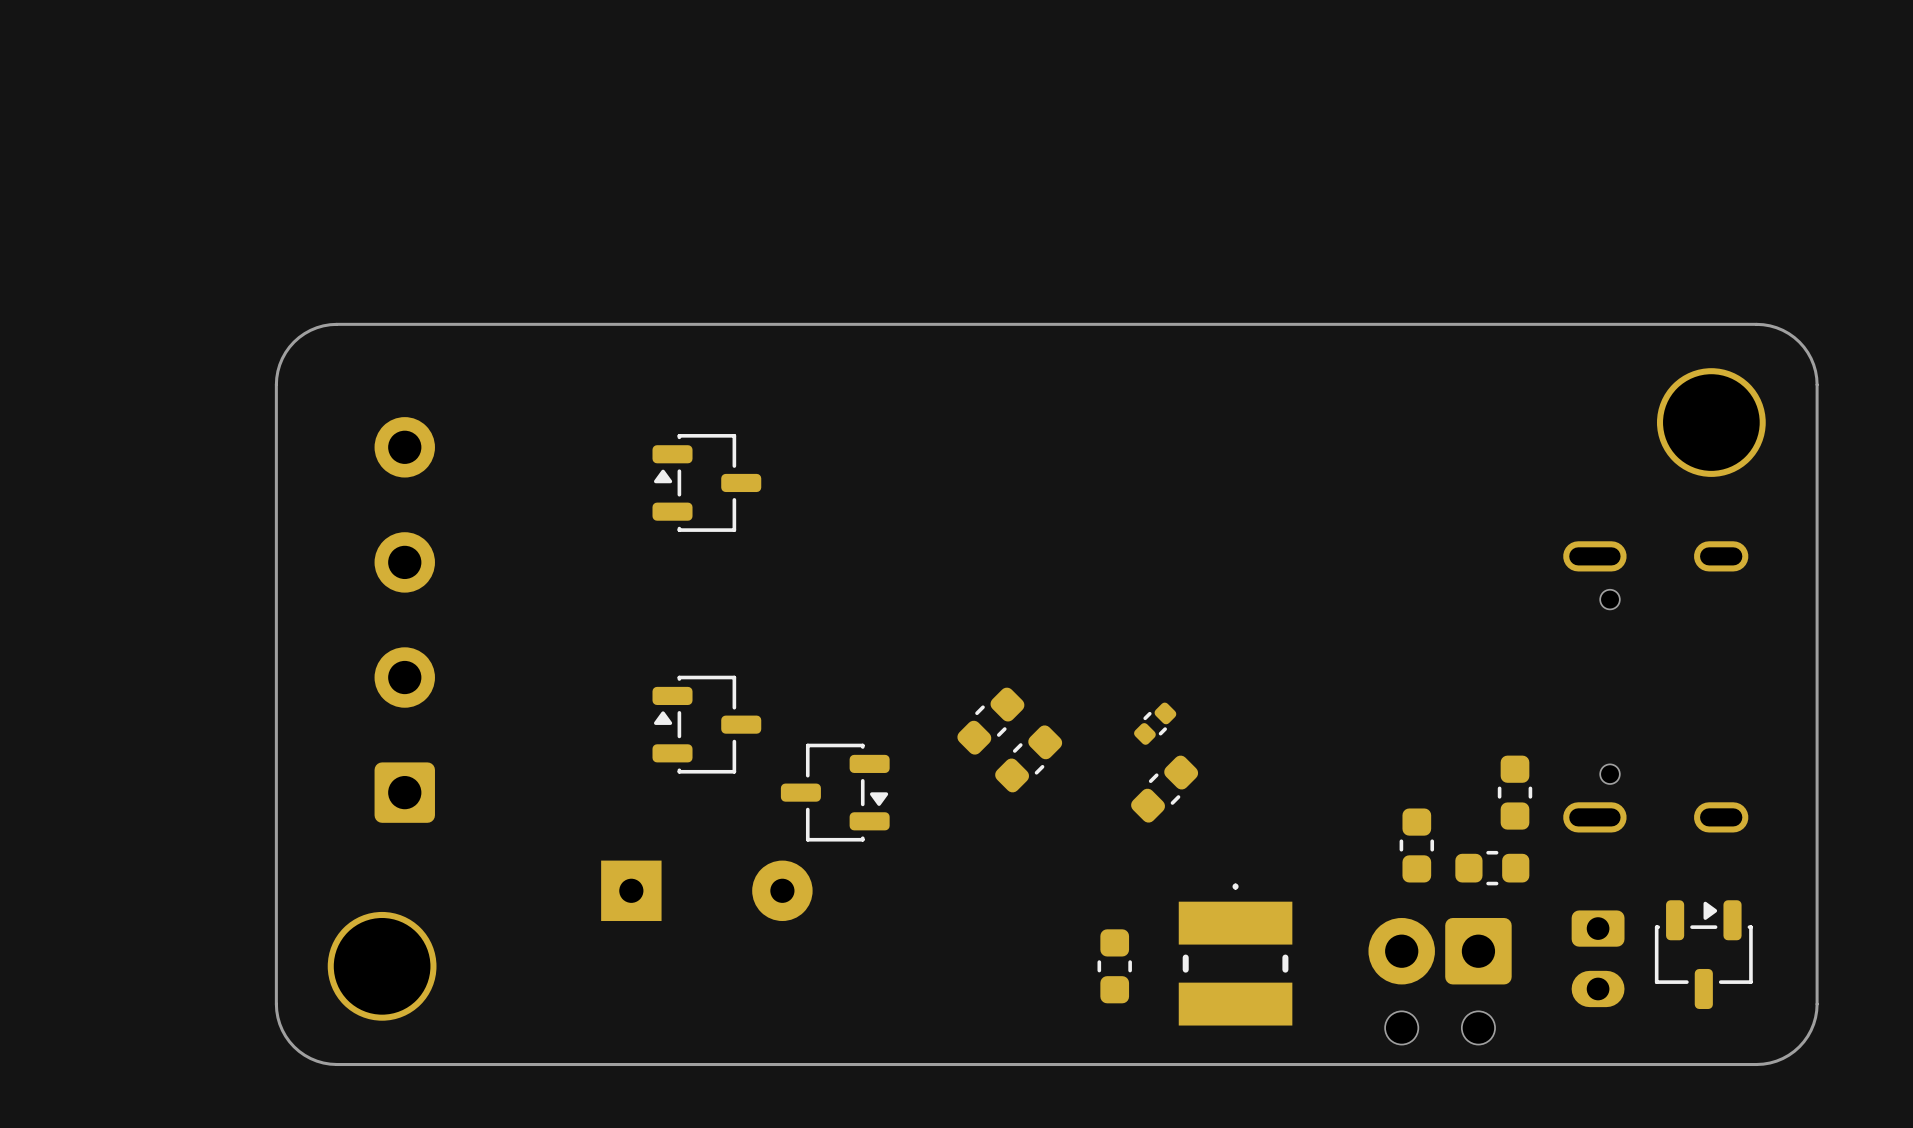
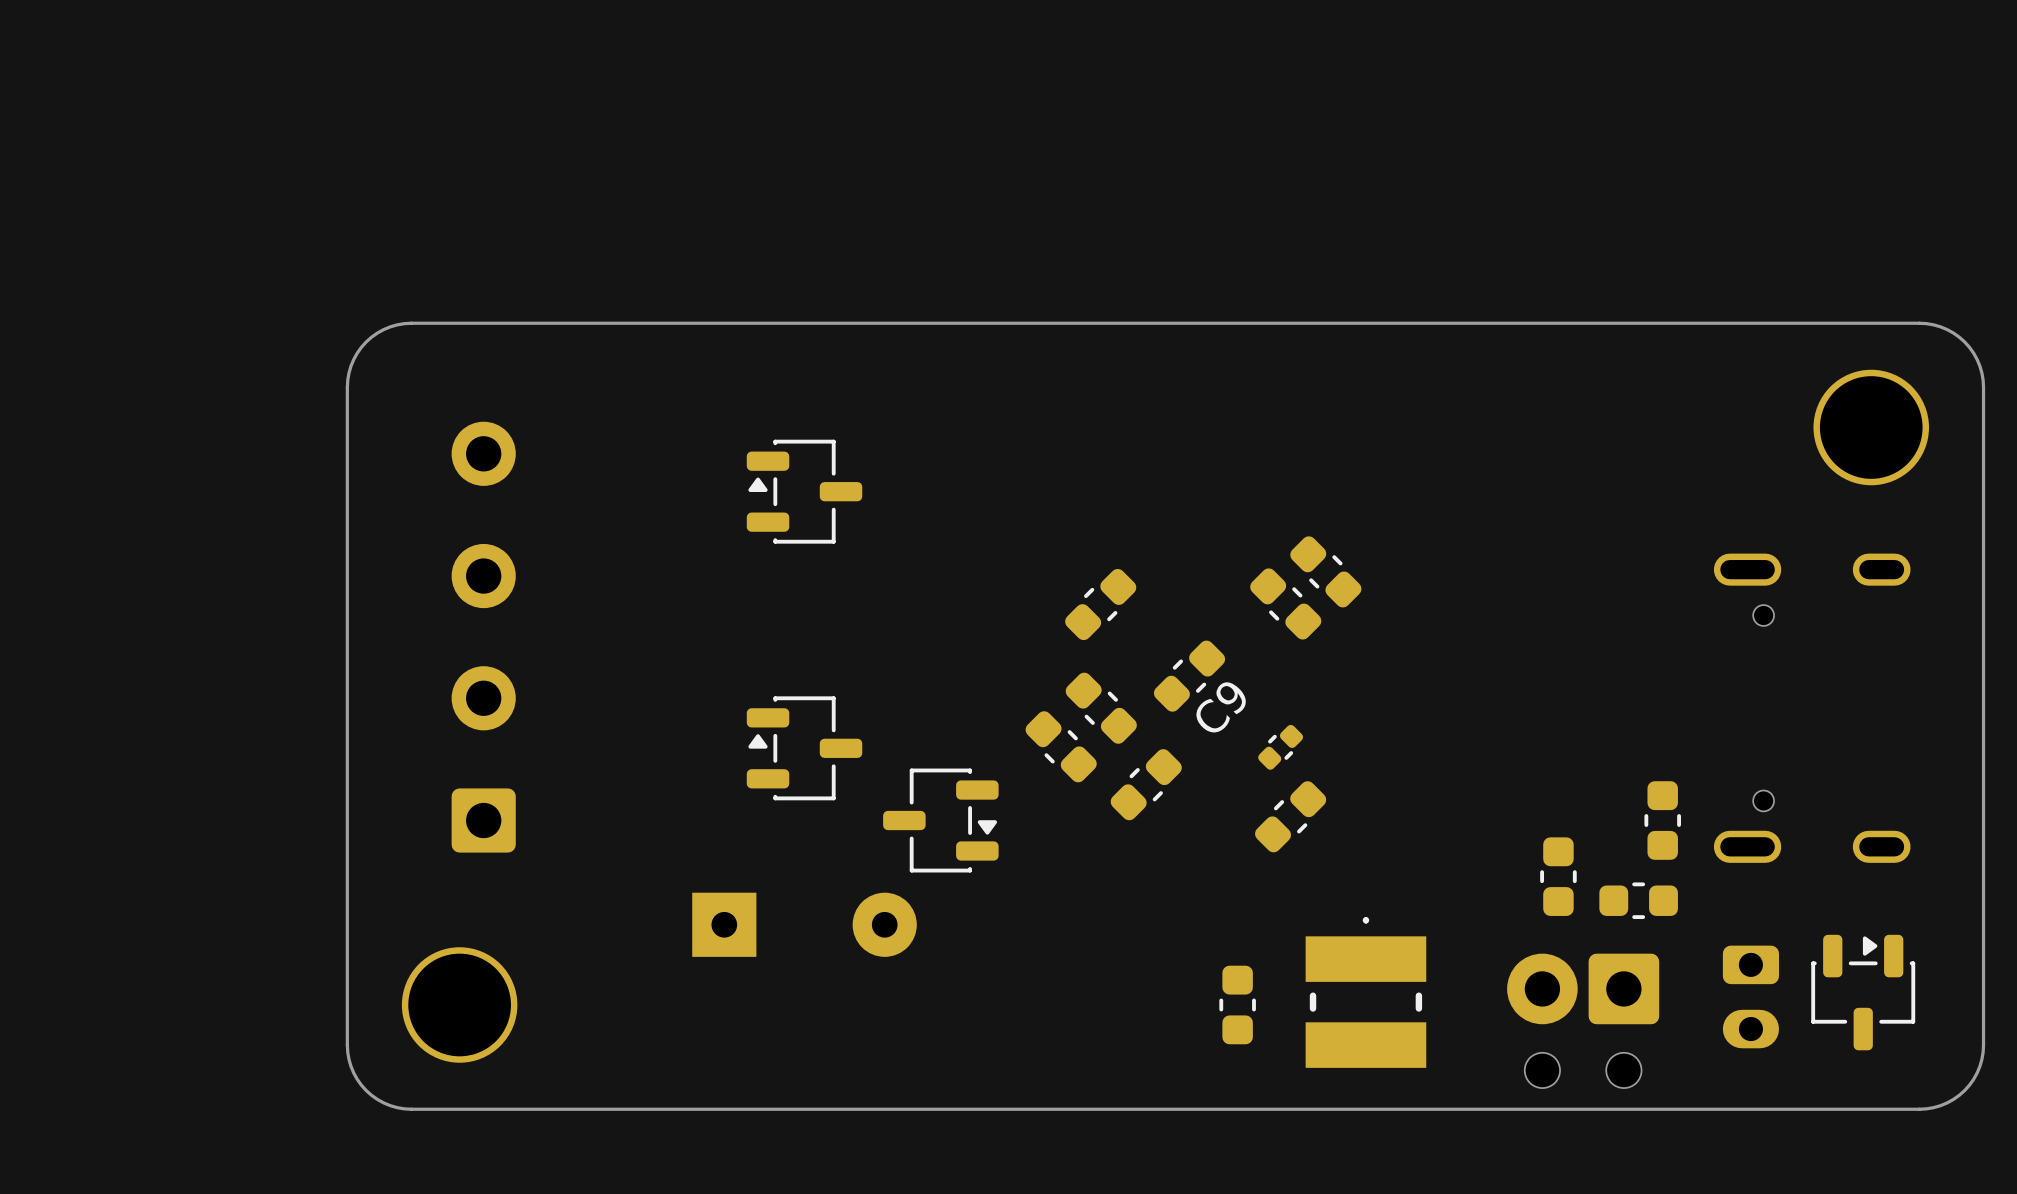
part: none -> (1325, 571)
part: none -> (1285, 603)
part: none -> (1100, 604)
C9: none -> (1189, 676)
part: none -> (1101, 708)
part: (990, 721) -> none
part: none -> (1061, 746)

